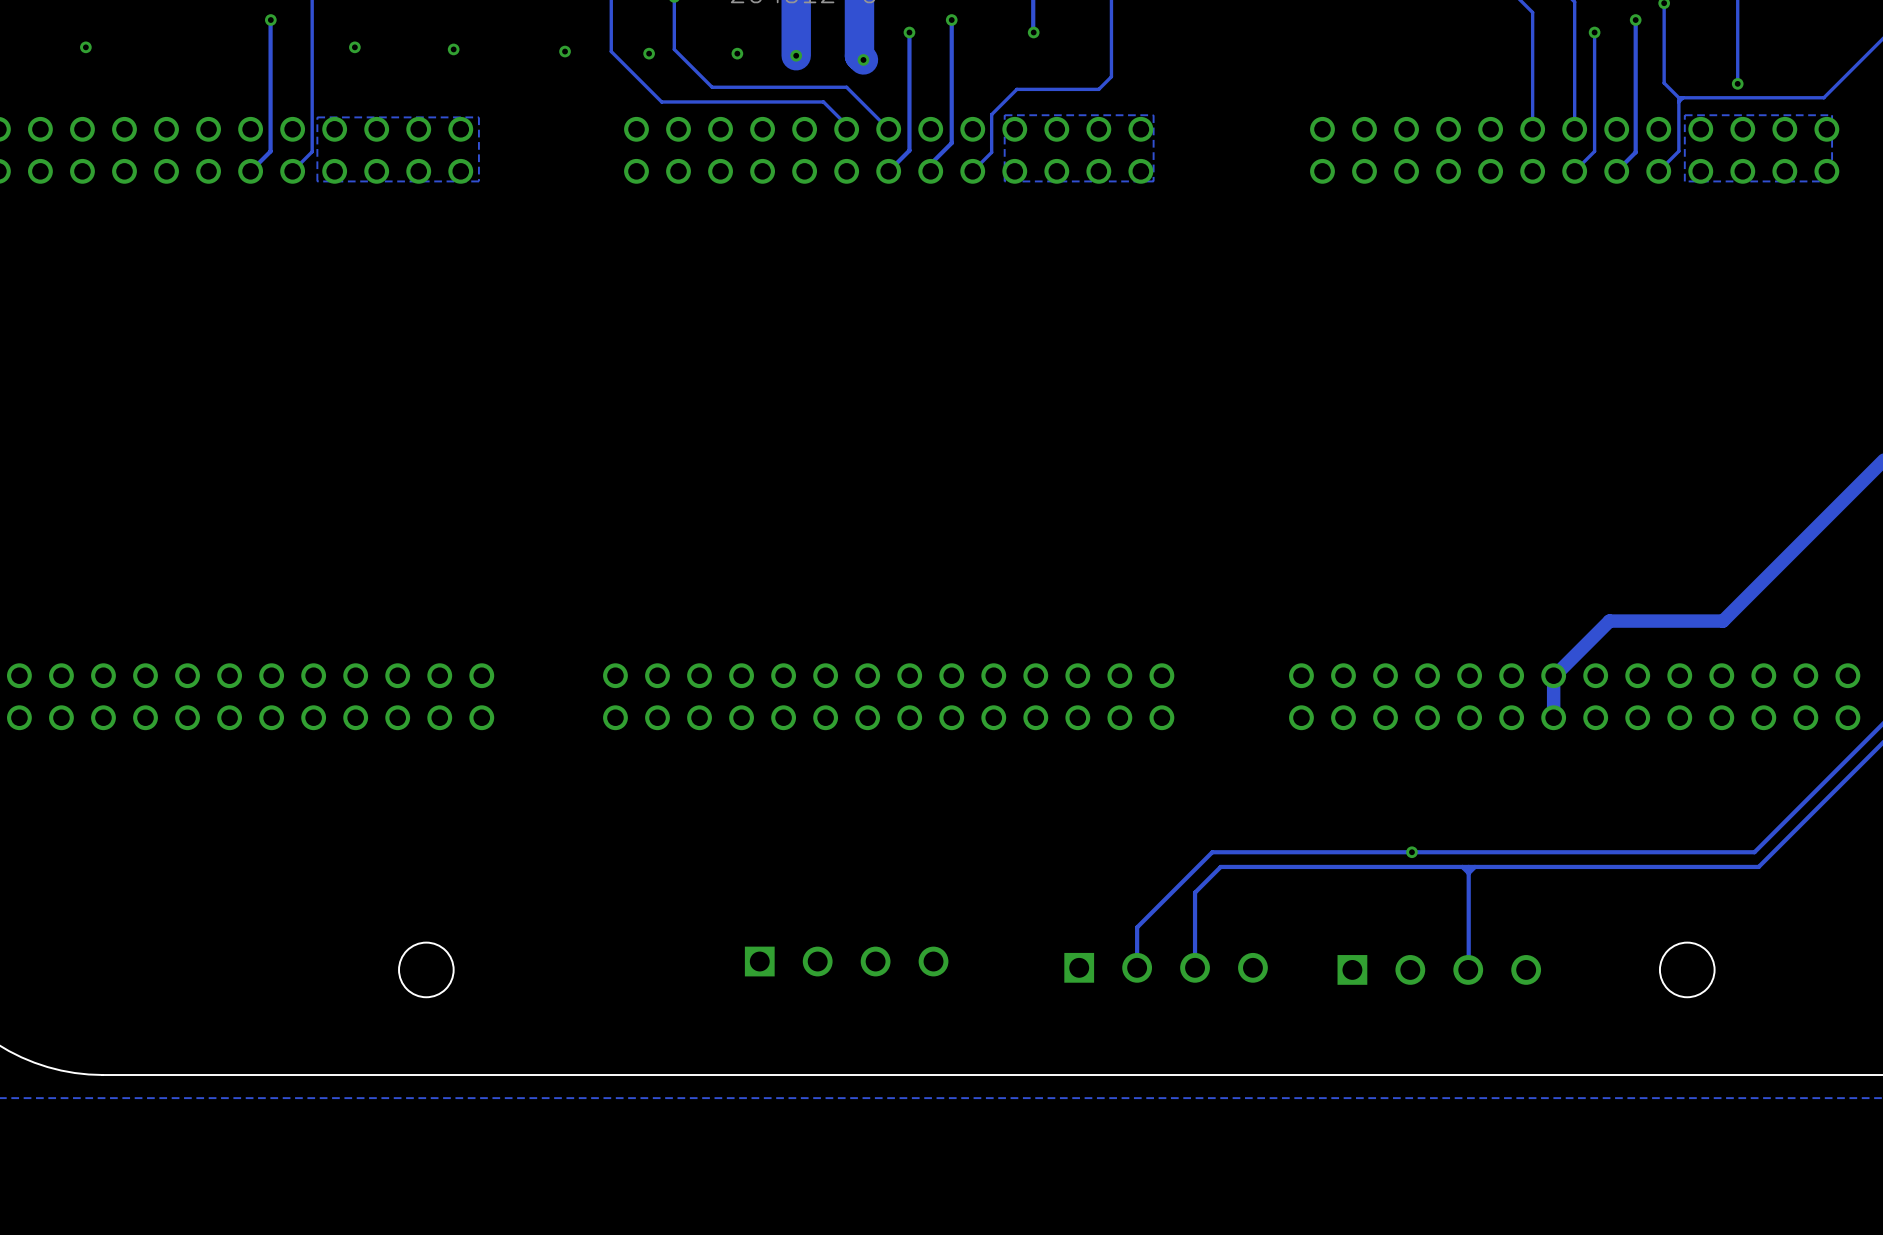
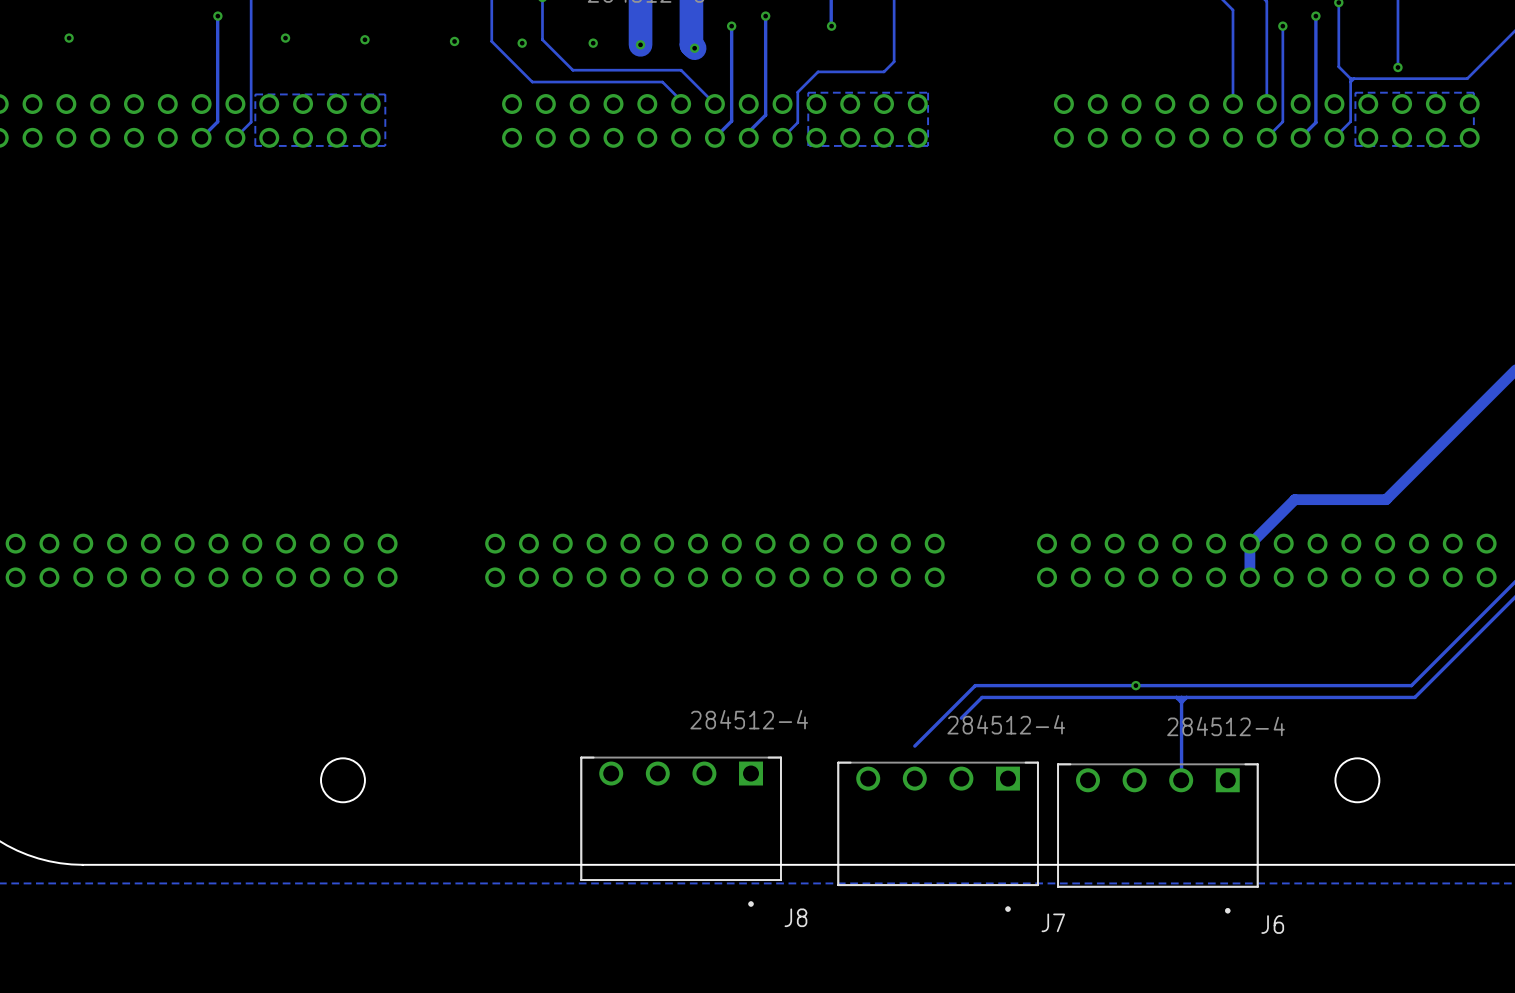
track: (1195, 892) (1195, 967) -> none
track: (1137, 927) (1137, 967) -> none
part: (846, 961) -> none
part: (1166, 967) -> none
part: (1439, 969) -> none
J8: none -> 284512-4 (681, 831)
J7: none -> 284512-4 (938, 836)
J6: none -> 284512-4 (1157, 838)

